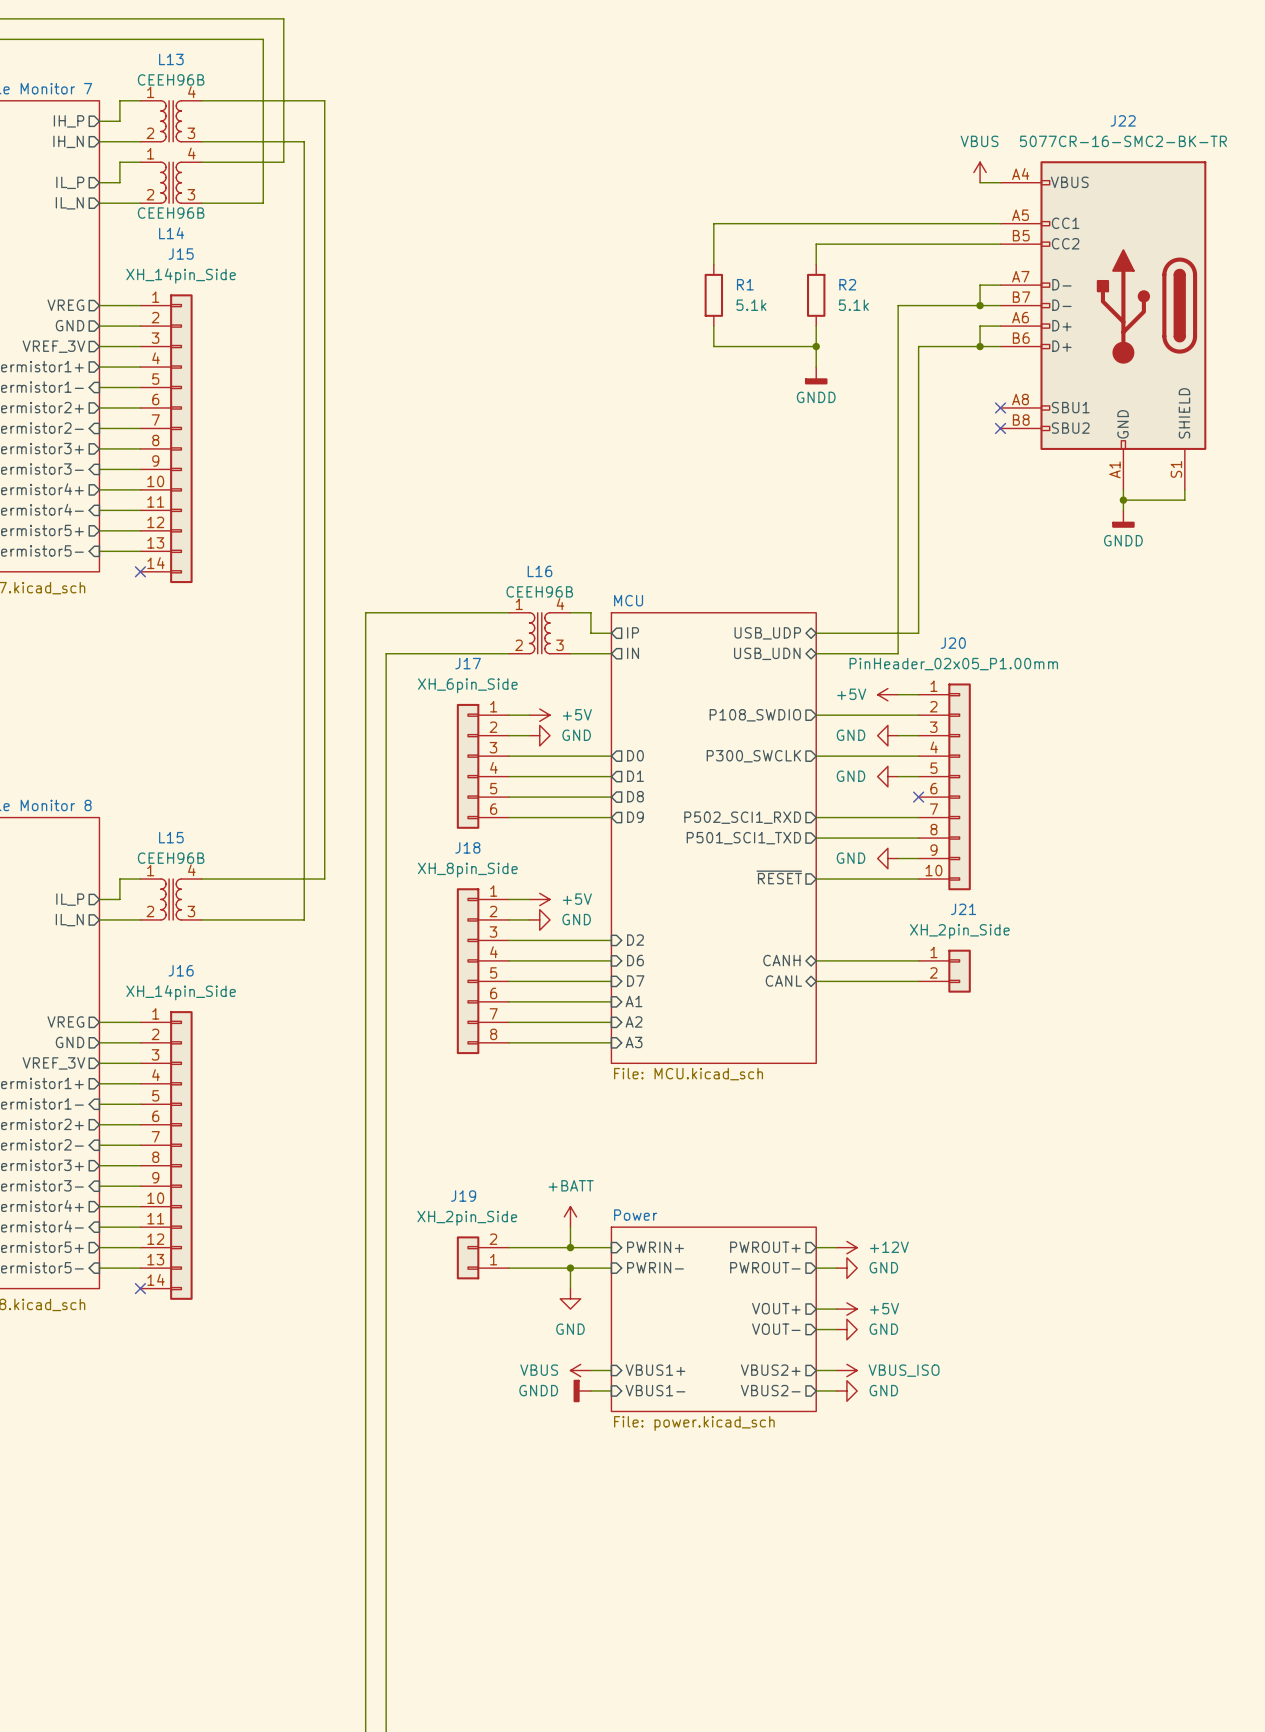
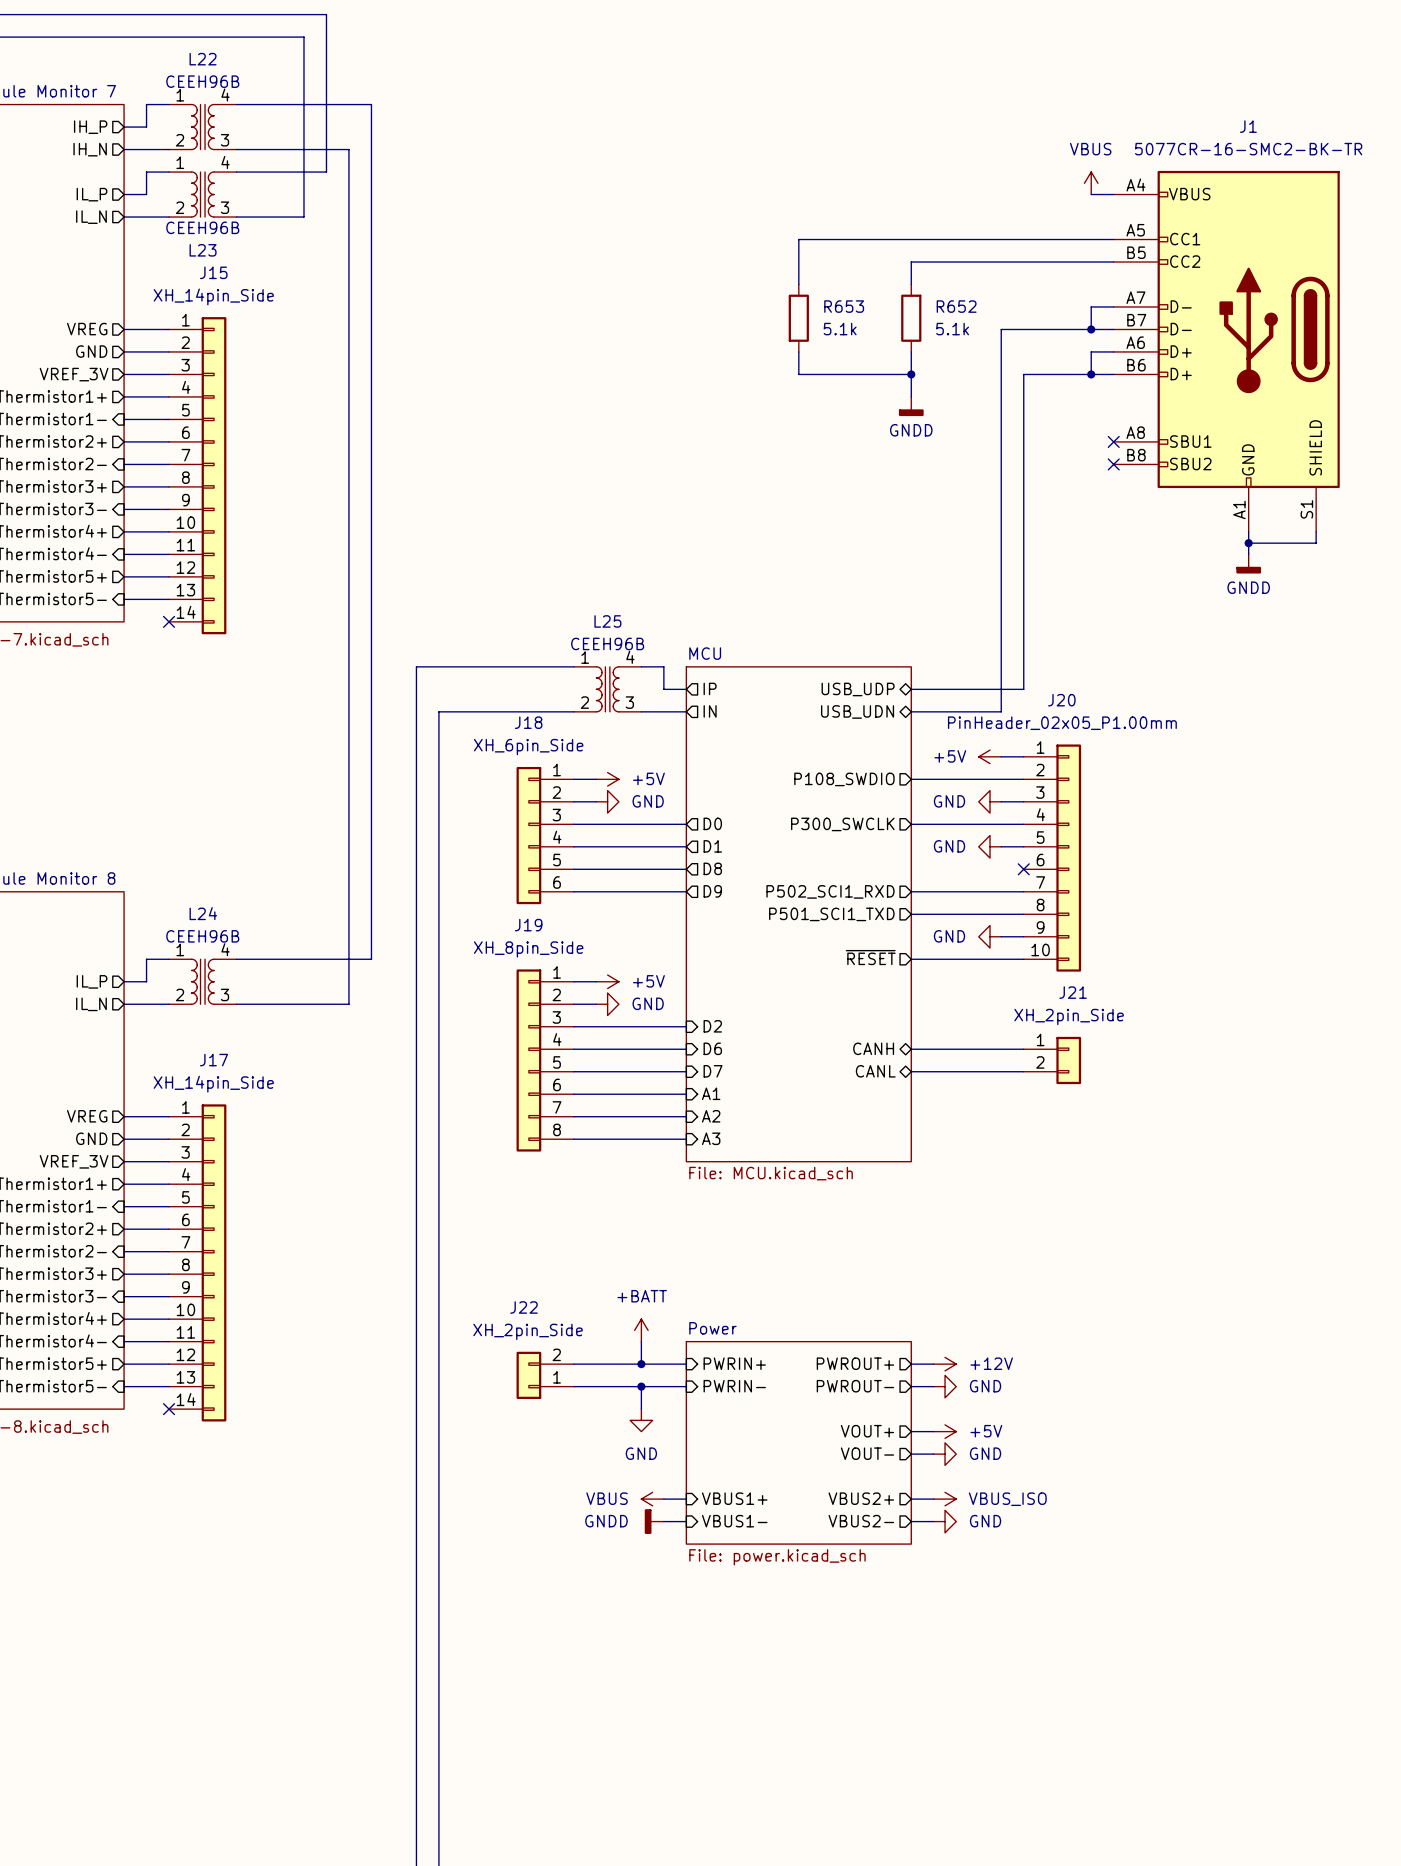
L13 name: L13 (171, 59) -> L22 (203, 59)
J22 name: J22 (1123, 120) -> J1 (1248, 126)
L14 name: L14 (171, 233) -> L23 (203, 250)
R1 name: R1 (745, 284) -> R653 (844, 306)
R2 name: R2 (847, 284) -> R652 (956, 306)
L16 name: L16 (539, 571) -> L25 (607, 621)
J17 name: J17 (468, 663) -> J18 (528, 722)
L15 name: L15 (171, 837) -> L24 (203, 913)
J18 name: J18 (467, 847) -> J19 (528, 925)
J16 name: J16 (181, 970) -> J17 (214, 1060)
J19 name: J19 (463, 1196) -> J22 (524, 1307)

